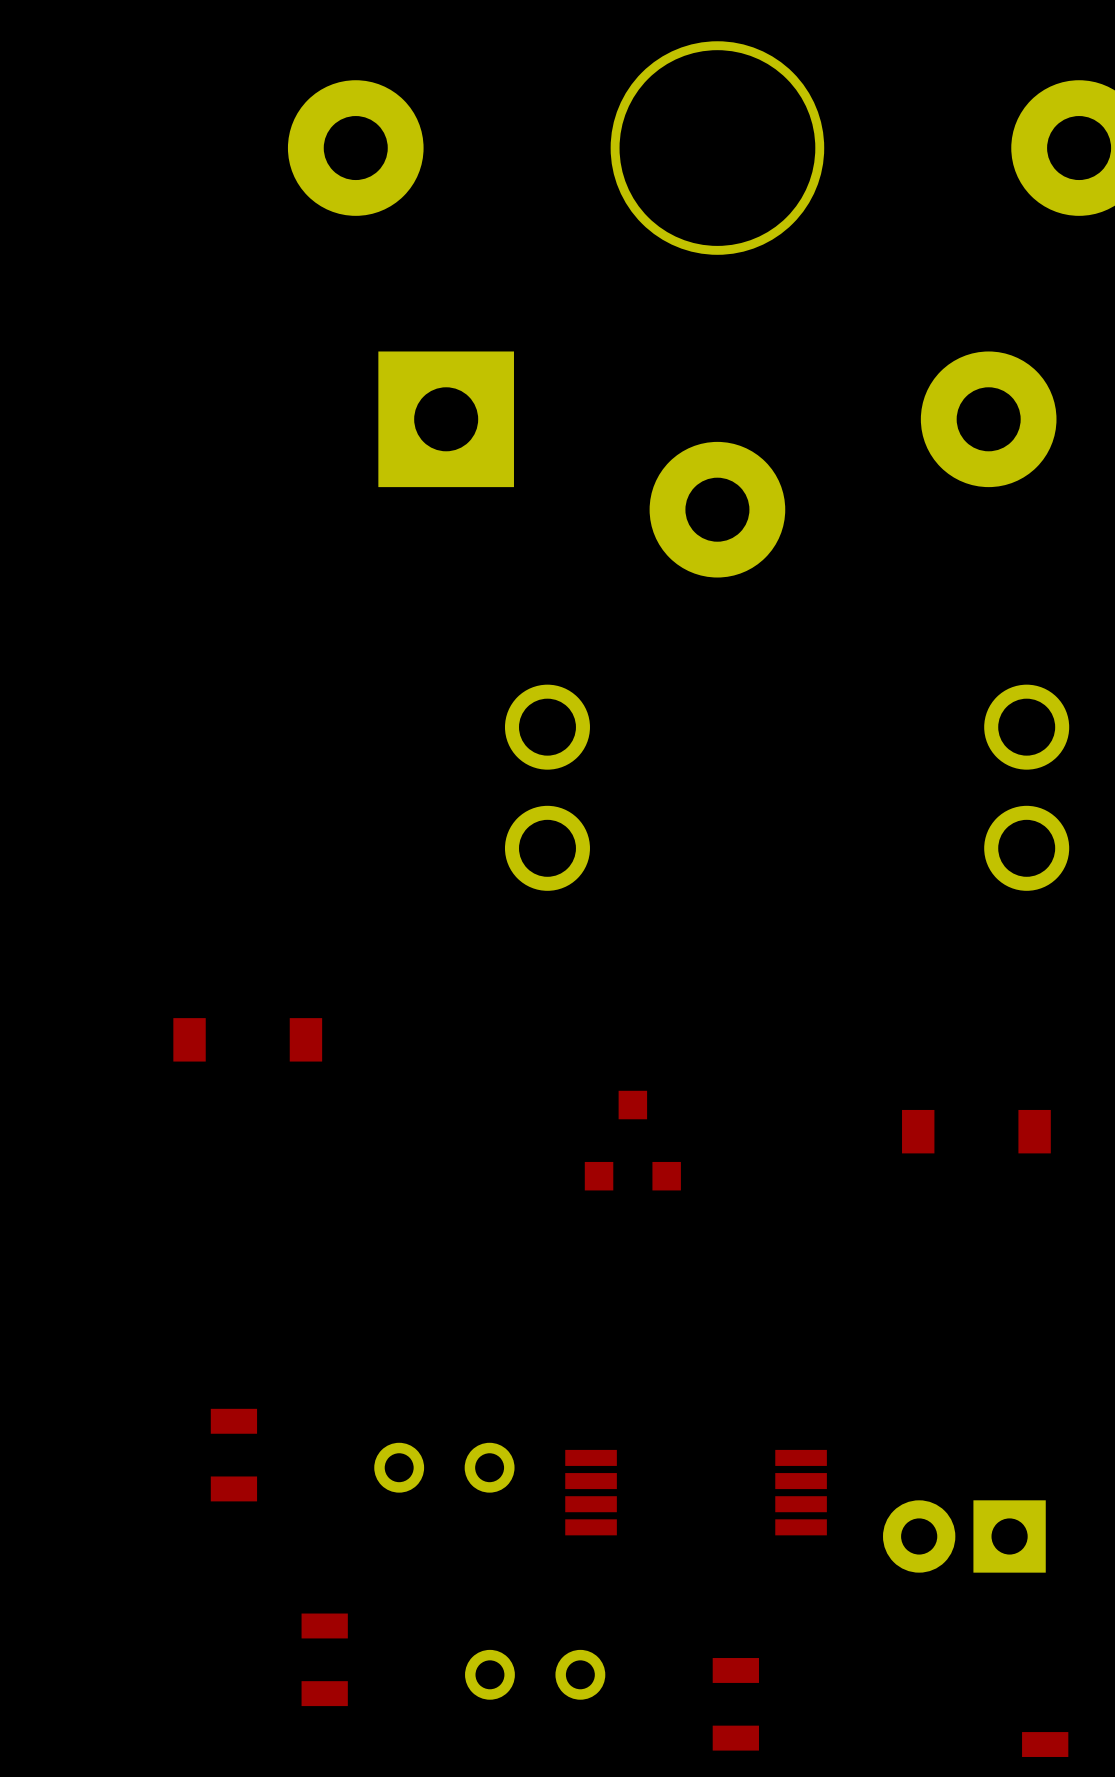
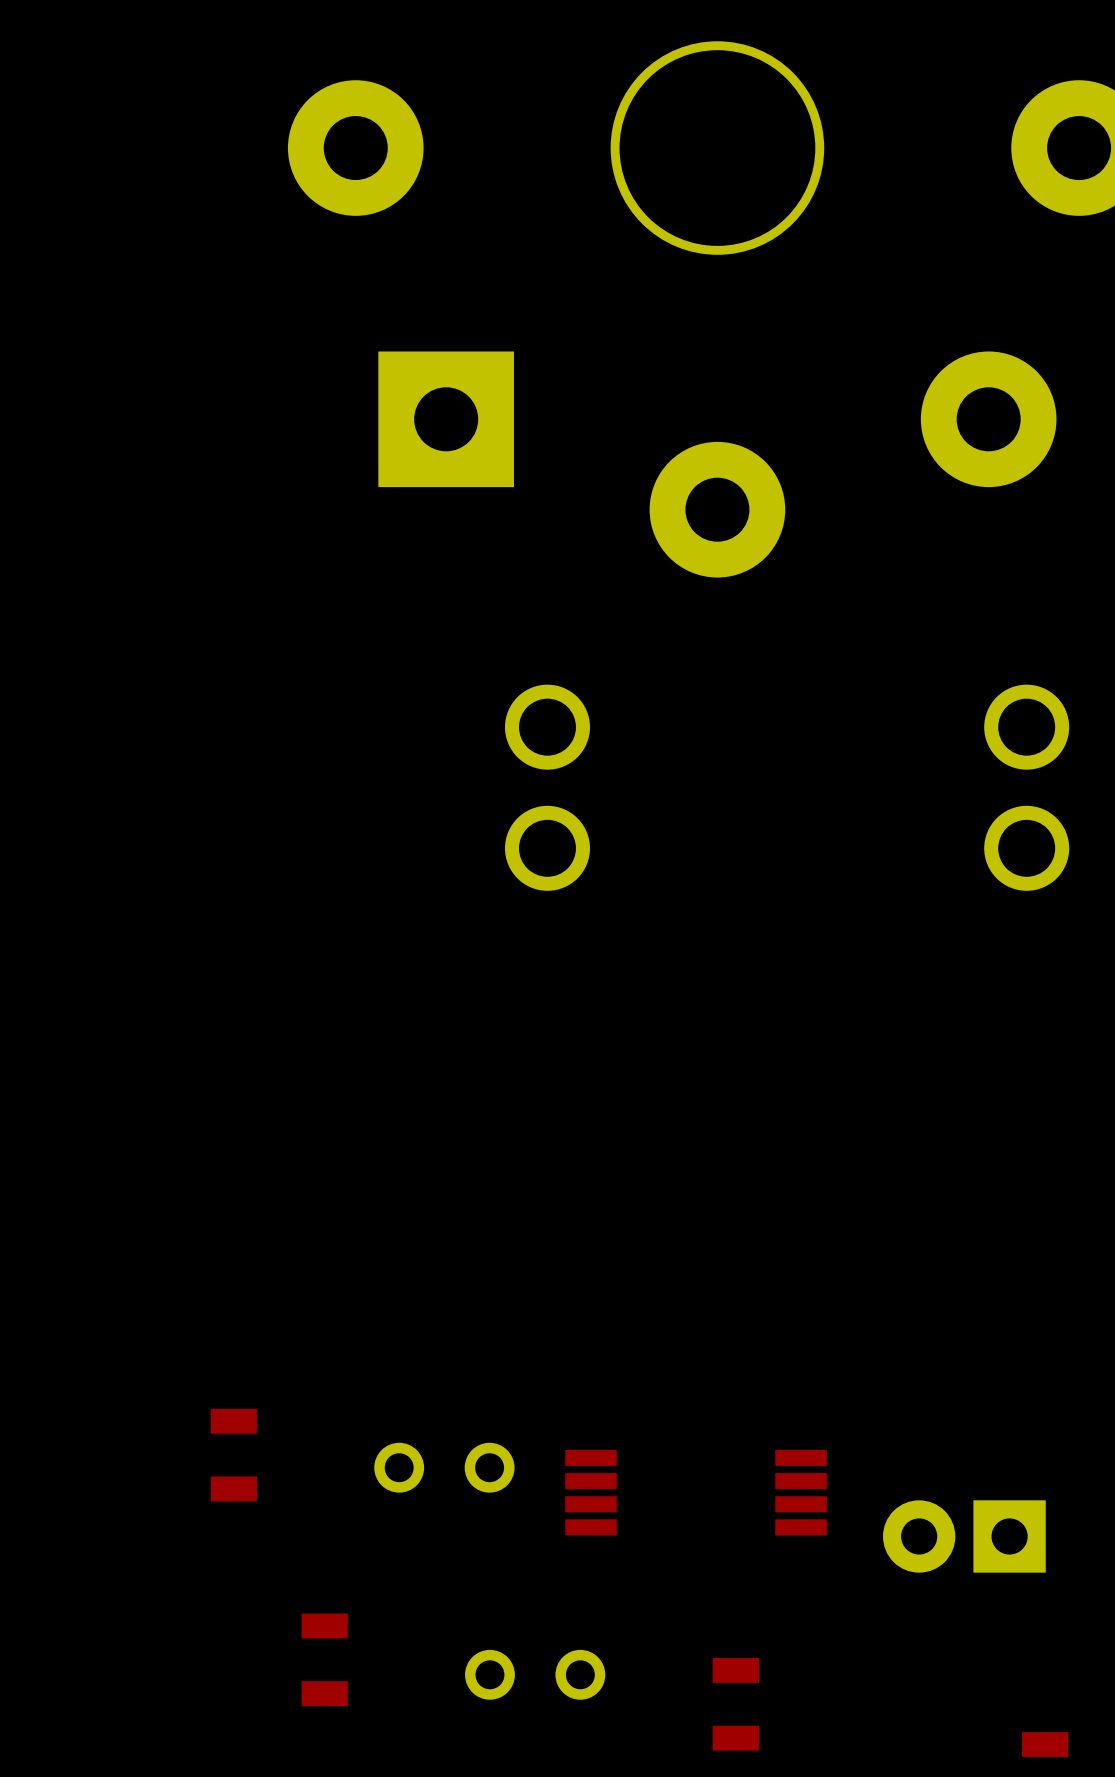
part: (247, 1039) -> none
part: (976, 1131) -> none
part: (632, 1140) -> none

